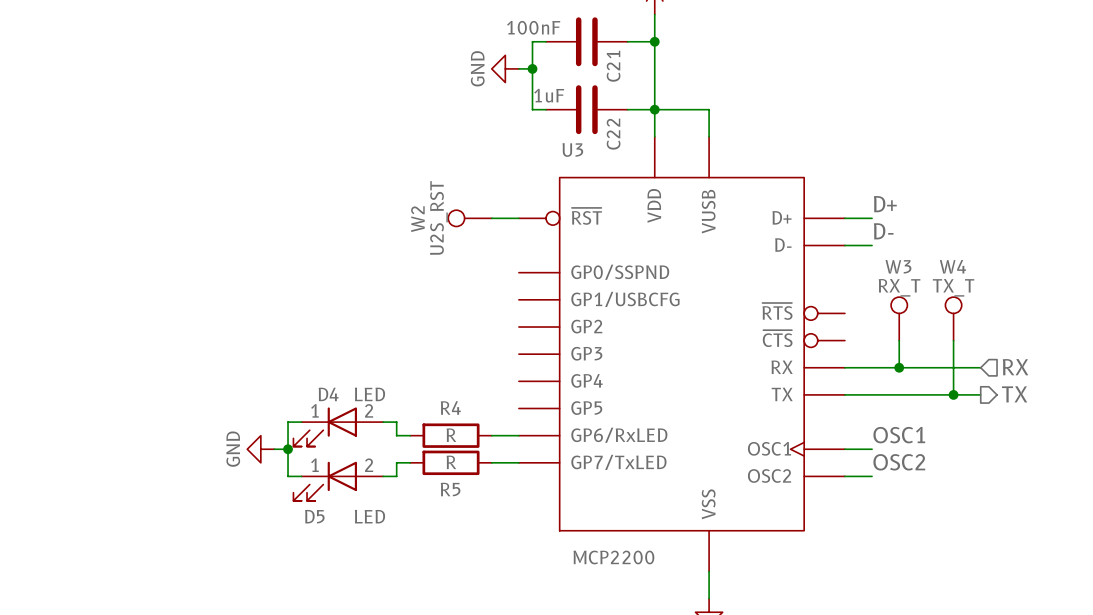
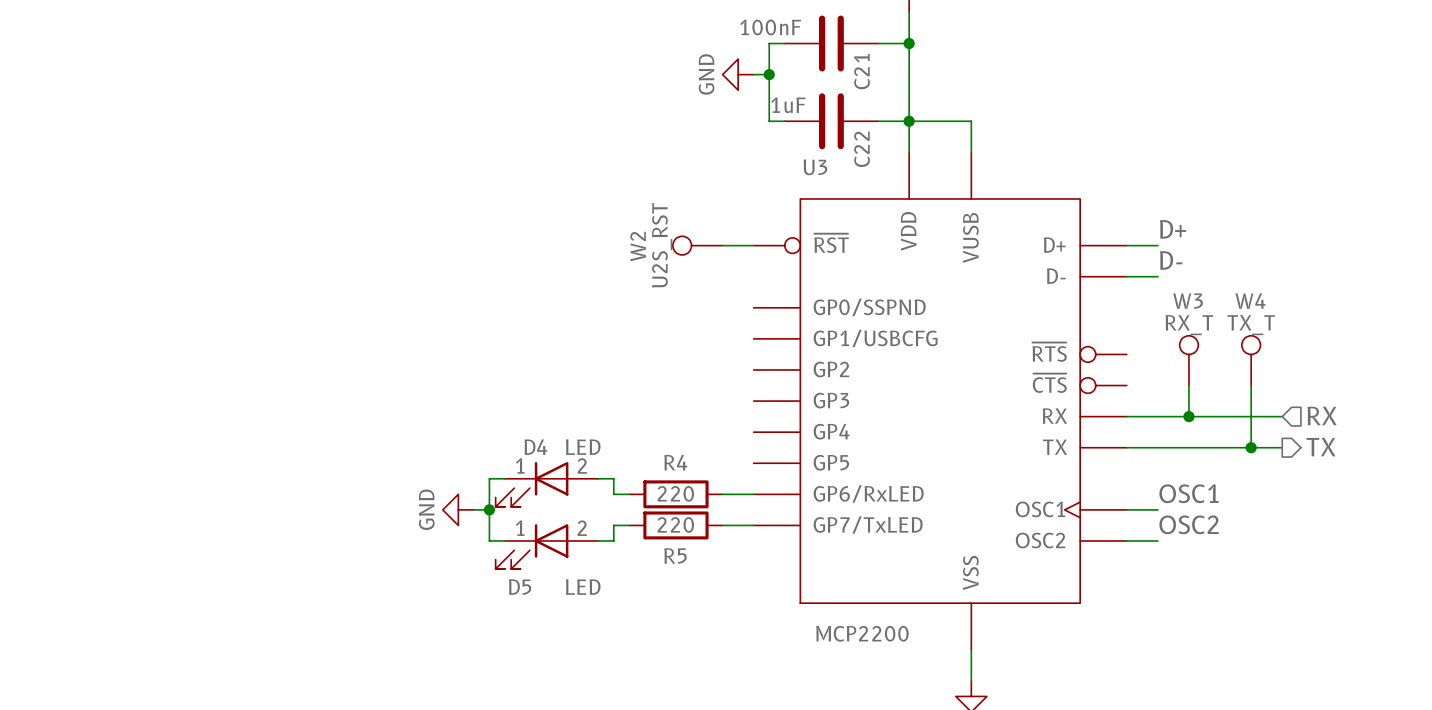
R4 value: R (451, 435) -> 220 (675, 493)
R5 value: R (451, 462) -> 220 (675, 524)

